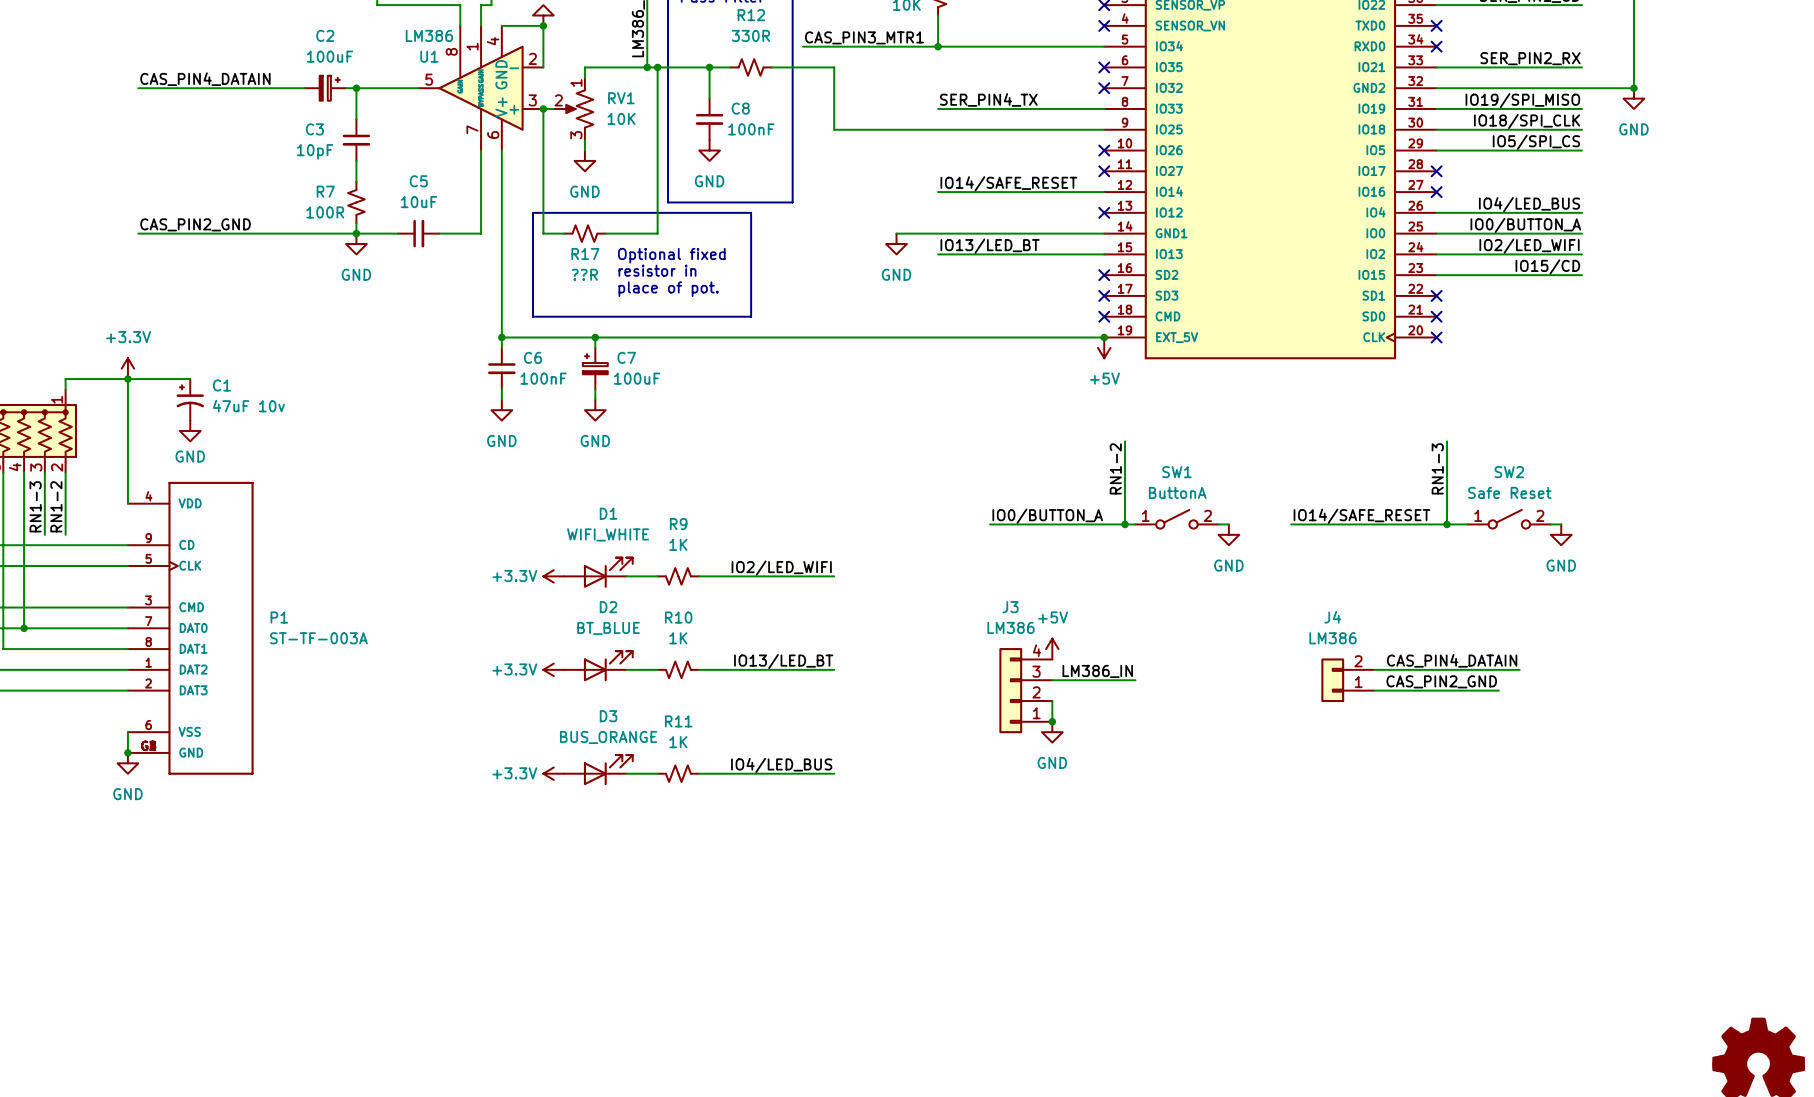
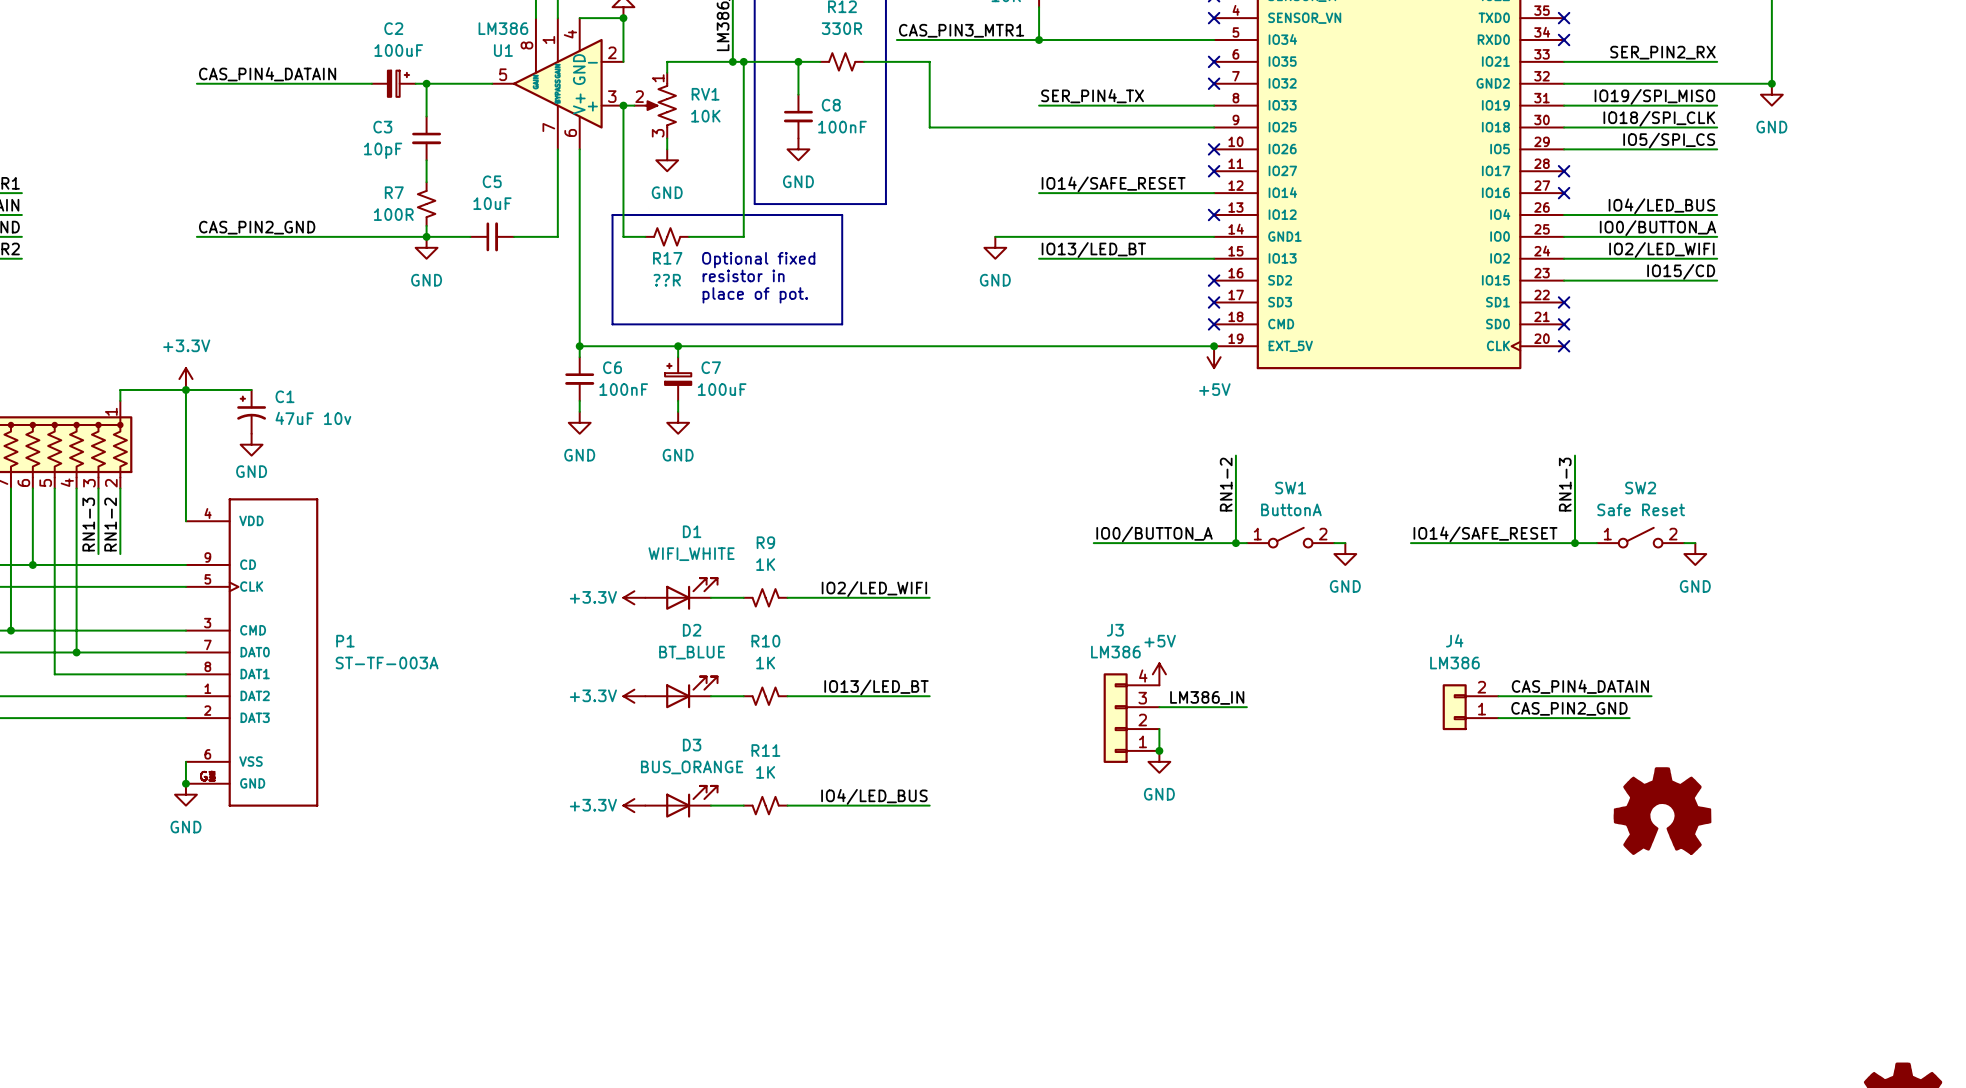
power symbol: none -> (1662, 811)

